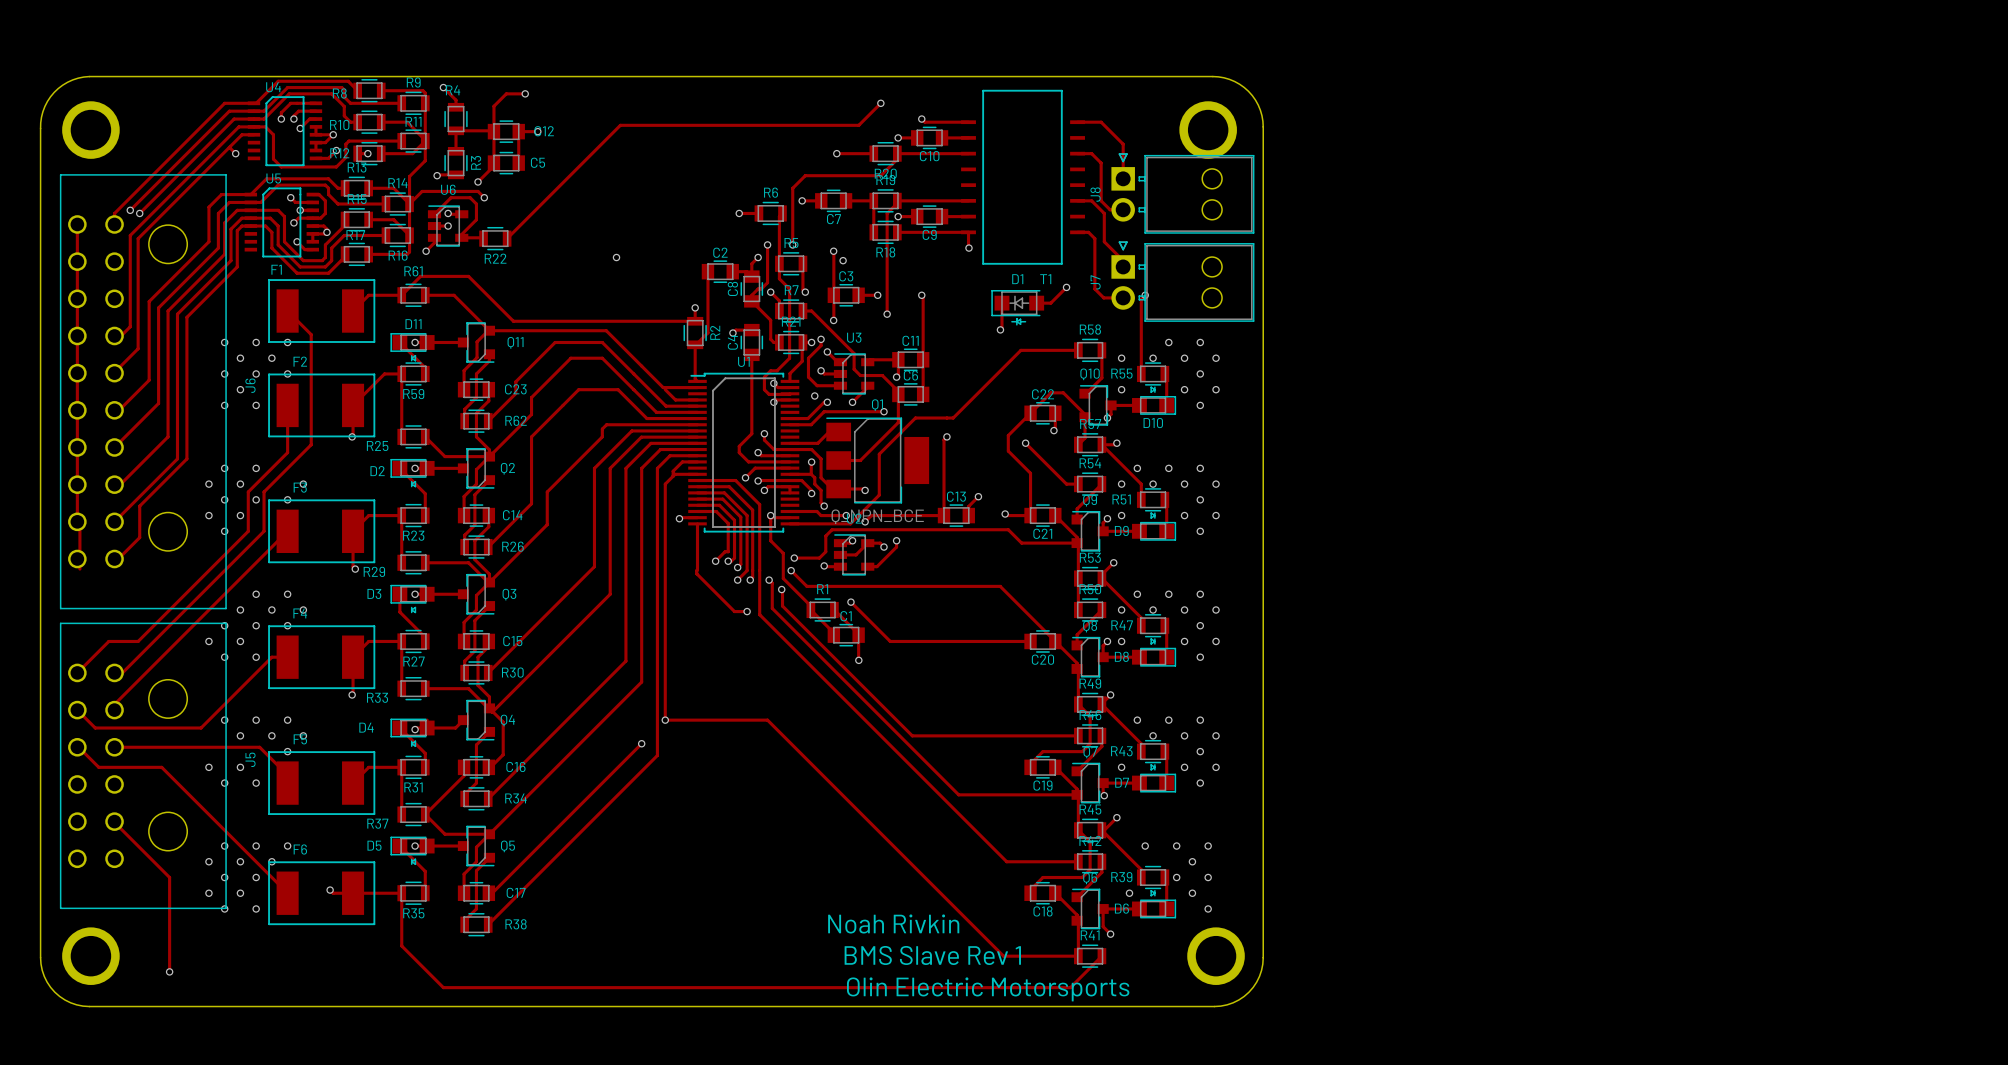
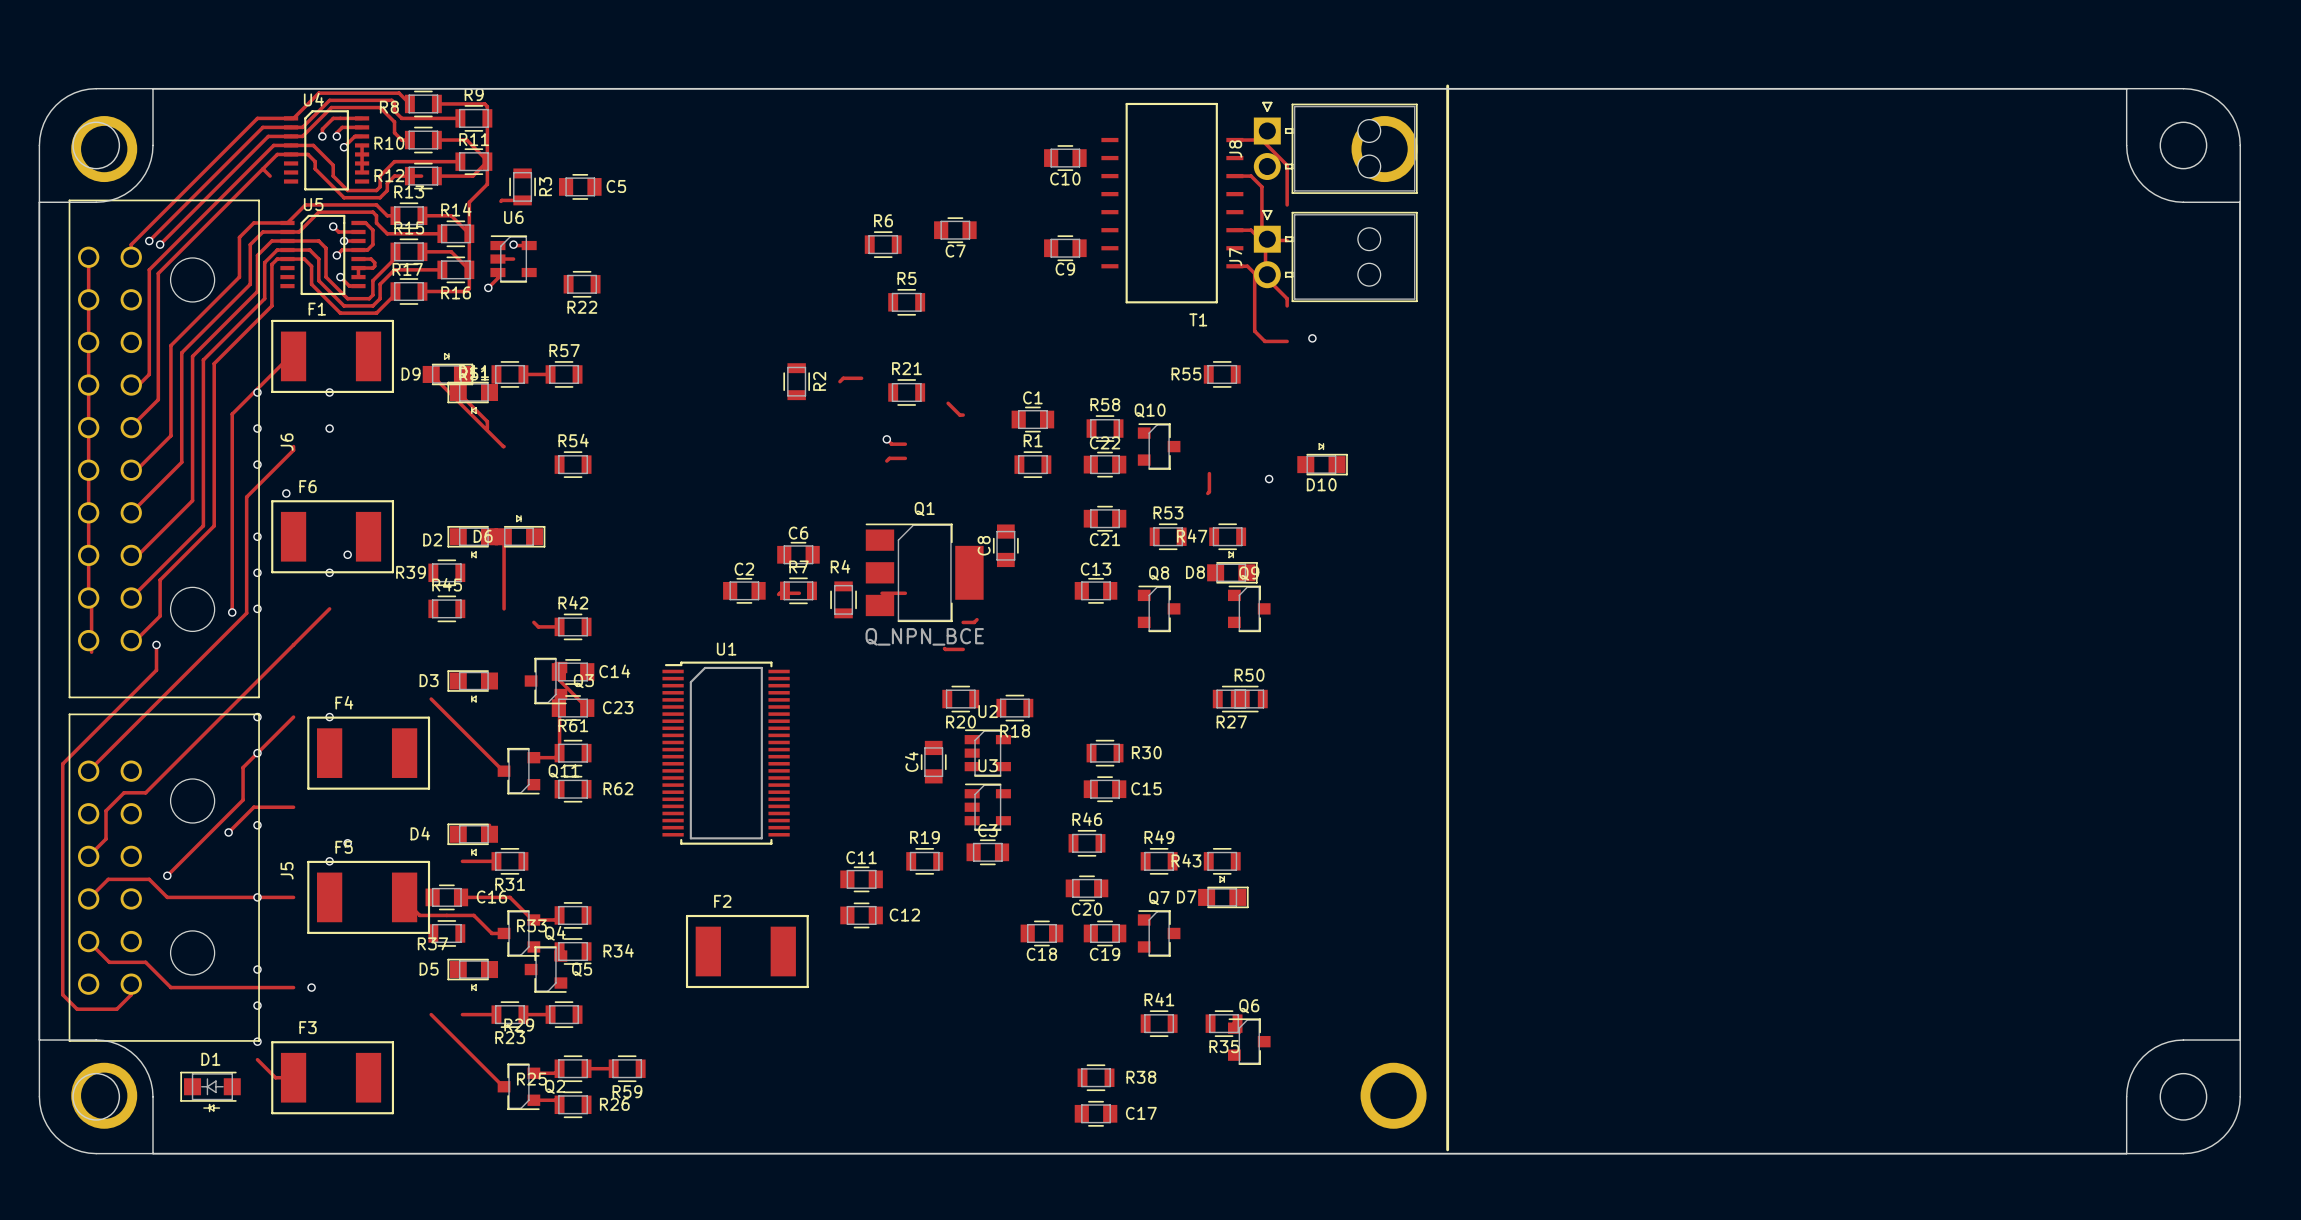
line: none -> (1447, 85) (1447, 1149)
board edge: (89, 76) (1212, 76) (1229, 79) (1244, 87) (1258, 105) (1263, 126) (1263, 957) (1261, 970) (1253, 987) (1238, 999) (1227, 1004) (1214, 1006) (89, 1006) (76, 1004) (59, 996) (47, 982) (42, 970) (40, 957) (40, 122) (44, 106) (58, 88) (72, 79) (89, 76) -> (96, 88) (74, 93) (56, 105) (43, 123) (39, 145) (39, 1096) (41, 1111) (51, 1131) (61, 1141) (74, 1149) (96, 1153) (2183, 1153) (2198, 1151) (2211, 1145) (2228, 1131) (2235, 1118) (2240, 1096) (2240, 145) (2238, 130) (2232, 117) (2218, 100) (2205, 93) (2183, 88) (96, 88)
board edge: none -> (153, 88) (152, 152) (148, 167) (136, 185) (117, 197) (103, 201) (39, 202)
board edge: none -> (2126, 88) (2127, 152) (2134, 173) (2143, 185) (2161, 197) (2176, 201) (2240, 202)
track: (443, 87) (456, 100) (456, 107) -> none
via: (443, 87) -> none
track: (525, 93) (506, 93) (493, 106) (493, 166) (478, 181) -> none
via: (525, 93) -> none
track: (880, 103) (858, 125) (620, 125) (507, 238) -> none
via: (880, 103) -> none
round board edge: none -> [72, 121, 121, 170]
round board edge: none -> [2159, 121, 2208, 170]
R4 position: (456, 119) -> (843, 599)
track: (921, 119) (924, 122) (968, 122) -> none
via: (921, 119) -> none
track: (265, 126) (273, 134) (273, 159) (281, 166) (336, 166) (345, 157) (345, 144) (348, 141) -> (304, 145) (313, 145) (333, 165) (333, 176) (347, 190) (376, 190) (380, 186) (380, 176) (394, 161) (399, 161)
track: (493, 131) (456, 130) (456, 151) -> none
C12 position: (506, 131) -> (861, 915)
track: (537, 131) (518, 131) (518, 163) -> none
via: (537, 131) -> none
track: none -> (291, 154) (307, 154) (315, 161) (315, 168) (344, 197) (380, 197) (387, 190) (387, 183) (394, 176) (409, 176)
track: (315, 134) (333, 134) (325, 142) (315, 142) -> (362, 154) (362, 163)
via: (333, 134) -> none
track: (898, 137) (917, 137) -> none
via: (898, 137) -> none
track: (942, 137) (968, 137) -> none
track: (336, 150) (328, 158) (315, 158) -> none
via: (336, 150) -> none
via: (235, 153) -> none
via: (367, 153) -> none
track: (836, 153) (873, 153) -> none
via: (836, 153) -> none
R20 position: (885, 153) -> (960, 699)
track: (968, 153) (897, 153) (897, 159) (880, 175) (805, 175) (792, 188) (792, 244) -> none
via: (437, 175) -> none
via: (478, 181) -> none
J8 position: (1182, 193) -> (1335, 147)
track: (484, 197) (478, 191) (422, 191) (409, 204) -> none
via: (484, 197) -> none
track: (802, 200) (821, 200) -> none
via: (802, 200) -> none
track: (846, 200) (873, 200) (873, 232) -> none
R19 position: (885, 200) -> (924, 861)
track: (968, 200) (897, 200) (897, 203) (887, 213) (887, 314) -> none
track: (739, 213) (758, 213) -> none
via: (739, 213) -> none
track: (782, 213) (779, 216) (779, 278) (789, 288) (789, 358) (777, 370) (770, 370) (764, 377) (764, 389) (769, 394) (789, 393) -> none
track: (434, 214) (451, 197) (470, 197) (476, 204) (476, 219) (461, 234) (461, 237) (483, 238) -> none
track: (898, 216) (917, 216) -> none
via: (898, 216) -> none
track: (942, 216) (968, 216) -> none
via: (448, 226) -> none
via: (326, 232) -> none
R18 position: (885, 232) -> (1014, 708)
track: (897, 232) (968, 232) (968, 248) -> none
R22 position: (495, 238) -> (582, 284)
track: (767, 244) (767, 282) (751, 295) (751, 301) (770, 320) (770, 339) (773, 342) (779, 342) -> none
via: (767, 244) -> none
via: (792, 244) -> none
via: (968, 248) -> none
track: (833, 251) (833, 320) -> none
via: (833, 251) -> none
via: (616, 257) -> none
track: (758, 257) (751, 263) (751, 276) (746, 271) (732, 271) -> none
via: (758, 257) -> none
via: (843, 260) -> none
track: (802, 263) (802, 289) (805, 292) -> none
track: (707, 271) (707, 332) (695, 344) (695, 379) (697, 381) -> none
C2 position: (720, 271) -> (744, 590)
J7 position: (1182, 281) -> (1335, 256)
track: (1066, 287) (1050, 303) (1036, 303) -> none
via: (1066, 287) -> none
C8 position: (751, 288) -> (1005, 545)
track: (770, 292) (779, 300) (779, 311) -> none
via: (770, 292) -> none
via: (805, 292) -> none
R61 position: (413, 295) -> (573, 753)
track: (425, 295) (454, 295) (489, 330) -> none
C3 position: (846, 295) -> (987, 852)
track: (858, 295) (877, 295) -> none
via: (877, 295) -> none
track: (921, 295) (923, 394) -> none
via: (921, 295) -> none
track: (1145, 295) (1141, 299) (1141, 373) -> none
track: (1001, 303) (1000, 329) -> none
track: (695, 307) (695, 321) (513, 321) (468, 276) (420, 276) (401, 295) (368, 295) (353, 311) -> none
via: (695, 307) -> none
D1 position: (1017, 307) -> (210, 1092)
track: none -> (293, 356) (289, 356) (232, 414) (232, 612)
track: (287, 311) (311, 334) (311, 444) (264, 491) (264, 531) (122, 672) (114, 672) -> none
F1 position: (321, 311) -> (332, 356)
R7 position: (791, 311) -> (798, 590)
track: (802, 311) (811, 311) (854, 353) (854, 369) (860, 375) (882, 375) (898, 391) (898, 422) (860, 460) (838, 460) -> none
via: (887, 314) -> none
via: (833, 320) -> none
track: none -> (431, 374) (504, 446)
track: none -> (523, 374) (550, 374)
via: (1000, 329) -> none
via: (732, 333) -> none
track: (821, 339) (821, 345) (808, 358) (808, 377) (817, 385) (840, 385) -> none
via: (821, 339) -> none
via: (256, 342) -> none
track: (415, 342) (463, 342) -> none
via: (415, 342) -> none
Q11 position: (476, 342) -> (518, 771)
C4 position: (751, 342) -> (933, 762)
track: (811, 342) (802, 342) (802, 361) (789, 373) (789, 381) -> none
via: (811, 342) -> none
via: (1168, 342) -> none
via: (1200, 342) -> none
track: (1078, 350) (1020, 350) (953, 418) (915, 418) (879, 454) (879, 495) (850, 523) (789, 523) -> none
R58 position: (1090, 350) -> (1105, 428)
track: (1101, 350) (1101, 377) (1085, 393) -> none
via: (827, 351) -> none
track: (489, 354) (489, 360) (476, 373) (476, 397) (464, 409) (464, 421) -> none
track: (751, 354) (751, 433) (739, 446) (739, 452) (748, 461) (789, 461) -> none
via: (240, 358) -> none
via: (271, 358) -> none
via: (1121, 358) -> none
via: (1153, 358) -> none
via: (1184, 358) -> none
via: (1216, 358) -> none
C11 position: (910, 359) -> (861, 879)
track: (867, 362) (870, 359) (898, 359) (898, 375) (896, 377) -> none
track: (821, 370) (824, 373) (840, 373) -> none
via: (821, 370) -> none
via: (256, 373) -> none
R59 position: (413, 373) -> (627, 1068)
U3 position: (854, 373) -> (987, 807)
R55 position: (1153, 373) -> (1222, 374)
track: (1164, 373) (1166, 375) (1166, 405) -> none
via: (1200, 373) -> none
via: (896, 377) -> none
track: (867, 385) (852, 402) -> none
track: (697, 387) (663, 387) (606, 330) (488, 330) (477, 341) (477, 357) (464, 370) (464, 389) -> none
via: (240, 389) -> none
C23 position: (476, 389) -> (573, 708)
track: (488, 389) (488, 400) (476, 413) (476, 436) (489, 449) (489, 456) (444, 456) (425, 436) -> none
track: (665, 389) (675, 399) (697, 399) -> none
via: (1121, 389) -> none
via: (1184, 389) -> none
via: (1216, 389) -> none
C6 position: (910, 394) -> (798, 554)
via: (814, 395) -> none
via: (773, 402) -> none
track: (827, 402) (824, 402) (807, 418) (789, 418) -> none
via: (827, 402) -> none
via: (852, 402) -> none
via: (256, 405) -> none
track: (287, 405) (287, 452) (248, 491) (248, 531) (138, 641) (108, 641) -> (293, 446) (293, 450) (246, 497) (246, 613) (124, 735)
F2 position: (321, 405) -> (747, 951)
Q10 position: (1098, 405) -> (1159, 446)
track: (1139, 405) (1111, 405) (1111, 414) (1107, 418) -> none
via: (1200, 405) -> none
track: (697, 406) (666, 406) (602, 342) (555, 342) (515, 381) (515, 393) (488, 421) -> none
track: (884, 411) (824, 411) (811, 424) (789, 424) -> none
via: (884, 411) -> none
track: (697, 412) (656, 412) (602, 358) (570, 358) (531, 397) (531, 414) (476, 469) (476, 484) (464, 496) (464, 515) -> none
C22 position: (1042, 413) -> (1105, 464)
track: (697, 418) (646, 418) (618, 389) (578, 389) (531, 436) (531, 503) (488, 547) -> (533, 622) (538, 626) (559, 626)
R62 position: (476, 421) -> (573, 789)
track: (697, 424) (606, 424) (602, 429) (602, 436) (547, 491) (547, 524) (476, 595) (476, 609) (464, 622) (464, 641) -> none
via: none -> (286, 493)
track: (697, 430) (631, 430) (594, 468) (594, 566) (488, 672) -> none
via: (1053, 430) -> none
track: (838, 432) (829, 432) (817, 443) (789, 443) -> none
track: (764, 433) (764, 440) (773, 449) (811, 449) (821, 458) (821, 477) (832, 489) (865, 490) -> none
via: (764, 433) -> none
track: (352, 436) (353, 405) (384, 373) (401, 373) (401, 436) -> none
via: (352, 436) -> none
R25 position: (413, 436) -> (573, 1068)
track: (946, 436) (944, 439) (944, 515) (871, 515) (865, 521) -> none
via: (946, 436) -> none
track: (697, 437) (641, 437) (610, 468) (610, 594) (492, 712) (489, 708) -> none
track: (697, 443) (650, 443) (625, 468) (625, 661) (488, 798) -> (461, 897) (509, 897) (532, 919) (555, 919) (559, 915)
track: (1025, 443) (1066, 484) (1078, 484) -> none
via: (1025, 443) -> none
track: (1116, 443) (1101, 444) (1141, 484) (1141, 499) -> none
via: (1116, 443) -> none
track: (1078, 444) (1085, 438) (1085, 414) (1063, 392) (1051, 392) (1008, 435) (1008, 451) (1030, 473) (1030, 515) (1005, 514) -> none
R57 position: (1090, 444) -> (564, 374)
track: (697, 449) (660, 449) (641, 468) (641, 682) (476, 847) (476, 861) (464, 874) (464, 893) -> none
U1 position: (743, 452) -> (726, 753)
track: (758, 452) (761, 455) (789, 455) -> none
via: (758, 452) -> none
track: (697, 455) (670, 455) (657, 468) (657, 755) (488, 924) -> none
Q1 position: (877, 460) -> (924, 572)
track: (697, 461) (682, 461) (673, 471) (673, 476) -> none
track: (811, 462) (811, 474) -> none
via: (811, 462) -> none
via: (256, 468) -> none
track: (399, 468) (425, 493) (425, 515) -> none
track: (415, 468) (463, 468) -> none
via: (415, 468) -> none
track: none -> (503, 536) (504, 608)
Q2 position: (476, 468) -> (518, 1086)
track: (789, 468) (755, 468) (745, 477) -> none
via: (1137, 468) -> none
via: (1168, 468) -> none
via: (1200, 468) -> none
track: (697, 474) (675, 474) (665, 484) (665, 720) (767, 720) (1003, 956) (1078, 956) (1077, 915) (1055, 893) -> none
track: (789, 474) (811, 474) -> none
track: (811, 474) (814, 477) (814, 484) (821, 490) (821, 502) (824, 506) -> none
via: (745, 477) -> none
track: (489, 480) (474, 494) (474, 525) (464, 535) (464, 547) -> none
track: (697, 480) (735, 480) (759, 504) (759, 614) (1006, 861) (1078, 861) -> none
track: (758, 480) (801, 480) (811, 490) (811, 493) -> none
via: (758, 480) -> none
via: (208, 484) -> none
via: (240, 484) -> none
R54 position: (1090, 484) -> (573, 464)
track: (1101, 484) (1077, 508) (1077, 519) -> none
via: (1121, 484) -> none
via: (1153, 484) -> none
via: (1184, 484) -> none
via: (1216, 484) -> none
track: (697, 486) (729, 486) (752, 510) (752, 577) (750, 580) -> none
track: (764, 490) (768, 486) (789, 486) (789, 492) -> none
via: (764, 490) -> none
via: (865, 490) -> none
track: (697, 492) (724, 492) (747, 515) (747, 570) (737, 580) -> none
via: (811, 493) -> none
track: (978, 496) (968, 506) (968, 515) -> none
via: (978, 496) -> none
via: (256, 499) -> none
track: (697, 499) (722, 499) (740, 517) (740, 564) (737, 567) -> none
R51 position: (1153, 499) -> (509, 374)
track: (1164, 499) (1166, 501) (1166, 531) -> none
via: (1200, 499) -> none
track: (697, 505) (719, 505) (734, 520) (734, 558) (728, 561) -> none
via: (824, 506) -> none
track: (697, 511) (716, 511) (728, 523) (728, 551) (725, 551) (715, 561) -> none
track: (789, 511) (816, 511) (821, 515) (846, 515) -> none
via: (1005, 514) -> none
via position: (208, 515) -> (232, 612)
via: (240, 515) -> none
R23 position: (413, 515) -> (509, 1014)
C14 position: (476, 515) -> (573, 671)
track: (488, 515) (488, 526) (474, 540) (474, 559) (489, 574) (489, 582) (468, 562) (425, 562) -> none
track: (770, 515) (770, 540) (783, 553) (783, 578) (810, 606) (810, 609) (833, 635) -> none
via: (770, 515) -> none
via: (846, 515) -> none
C21 position: (1042, 515) -> (1105, 518)
track: (1055, 515) (1077, 537) (1077, 543) -> none
via: (1121, 515) -> none
via: (1184, 515) -> none
via: (1216, 515) -> none
via: (679, 518) -> none
track: (1107, 518) (1103, 523) (1103, 531) (1139, 531) -> none
via: (1107, 518) -> none
via: (865, 521) -> none
track: (697, 523) (696, 573) (734, 611) (747, 611) -> none
D9 position: (1154, 526) -> (447, 369)
F3 position: (321, 531) -> (332, 1077)
via: (1200, 531) -> none
via: (852, 540) -> none
track: (896, 540) (896, 547) (876, 566) (867, 566) -> none
via: (896, 540) -> none
track: (1077, 543) (1021, 543) (1008, 529) (832, 529) (825, 536) (825, 551) (819, 558) (794, 558) -> none
track: (1077, 543) (1078, 609) -> none
R26 position: (476, 547) -> (573, 1104)
track: (884, 547) (880, 543) (867, 543) (855, 554) (840, 554) -> none
via: (884, 547) -> none
U2 position: (854, 554) -> (987, 753)
via: (794, 558) -> none
via: (715, 561) -> none
via: (728, 561) -> none
track: none -> (156, 644) (156, 670) (62, 763) (62, 994) (77, 1009) (116, 1009) (131, 994) (131, 984)
via: none -> (156, 644)
track: (401, 562) (401, 515) (368, 515) (353, 531) (353, 566) (355, 569) -> none
R29 position: (413, 562) -> (564, 1014)
track: (1113, 562) (1101, 574) (1101, 578) (1141, 617) (1141, 625) -> none
via: (1113, 562) -> none
via: (824, 565) -> none
via: (737, 567) -> none
via: (355, 569) -> none
track: (791, 570) (806, 586) (1000, 586) (1077, 663) (1078, 704) (1090, 716) (1090, 743) (1082, 751) (1042, 751) (1030, 764) (1030, 767) -> none
via: (791, 570) -> none
R53 position: (1090, 578) -> (1168, 536)
via: (737, 580) -> none
via: (750, 580) -> none
track: (769, 580) (772, 583) (772, 608) (958, 794) (1077, 794) -> none
via: (769, 580) -> none
track: none -> (558, 671) (558, 679) (587, 708)
track: (781, 589) (782, 606) (912, 735) (1078, 735) -> none
via: (781, 589) -> none
via: (256, 594) -> none
via: (287, 594) -> none
track: (399, 594) (399, 612) (425, 637) (425, 641) -> none
track: (415, 594) (463, 594) -> none
via: (415, 594) -> none
via: (1137, 594) -> none
via: (1168, 594) -> none
via: (1200, 594) -> none
track: (850, 602) (890, 641) (1030, 641) -> none
via: (850, 602) -> none
track: (489, 606) (474, 620) (474, 650) (464, 661) (464, 672) -> none
via: (240, 609) -> none
via: (271, 609) -> none
via: (303, 609) -> none
track: none -> (431, 699) (504, 771)
R1 position: (822, 609) -> (1032, 464)
track: (834, 609) (858, 634) (858, 660) -> none
track: (1101, 609) (1077, 634) (1077, 645) -> none
via: (1121, 609) -> none
via: (1153, 609) -> none
via: (1184, 609) -> none
via: (1216, 609) -> none
via: (747, 611) -> none
track: none -> (558, 708) (559, 753) (555, 757) (533, 757)
track: none -> (293, 717) (243, 767) (243, 800) (167, 875)
via: (256, 625) -> none
R47 position: (1153, 625) -> (1227, 536)
track: (1164, 625) (1166, 627) (1166, 657) -> none
via: (1200, 625) -> none
C1 position: (846, 635) -> (1032, 419)
via: (208, 641) -> none
via: (240, 641) -> none
R27 position: (413, 641) -> (1231, 699)
C15 position: (476, 641) -> (1105, 789)
track: (488, 641) (488, 646) (478, 657) (478, 685) (489, 696) (489, 708) -> none
C20 position: (1042, 641) -> (1086, 888)
track: (1107, 641) (1103, 645) (1103, 657) (1139, 657) -> none
via: (1107, 641) -> none
via: (1121, 641) -> none
via: (1184, 641) -> none
via: (1216, 641) -> none
D8 position: (1154, 652) -> (1232, 567)
via: (256, 657) -> none
track: (287, 657) (271, 657) (201, 728) (95, 728) (77, 710) -> none
Q8 position: (1090, 657) -> (1159, 608)
via: (1200, 657) -> none
via: (858, 660) -> none
R30 position: (476, 672) -> (1105, 753)
track: (401, 688) (401, 641) (368, 641) (353, 657) (352, 694) -> none
R33 position: (413, 688) -> (573, 915)
track: (425, 688) (468, 688) (489, 708) -> none
track: (127, 691) (114, 704) (114, 710) -> (145, 792) (124, 792) (106, 810) (106, 839) (88, 856)
via: (352, 694) -> none
track: (1110, 694) (1101, 704) (1141, 743) (1141, 751) -> none
via: (1110, 694) -> none
track: none -> (293, 807) (253, 807) (228, 832)
R49 position: (1090, 704) -> (1159, 861)
track: (489, 708) (503, 722) (503, 754) (488, 767) -> none
via: (256, 720) -> none
via: (287, 720) -> none
track: (463, 720) (455, 728) (416, 728) (415, 729) -> none
Q4 position: (476, 720) -> (518, 933)
via: (665, 720) -> none
via: (1137, 720) -> none
via: (1168, 720) -> none
via: (1200, 720) -> none
via: none -> (228, 832)
track: (399, 728) (425, 753) (425, 767) -> none
via: (415, 729) -> none
track: (489, 731) (476, 744) (476, 783) (464, 794) (464, 798) -> none
via: (240, 735) -> none
via: (271, 735) -> none
R46 position: (1090, 735) -> (1086, 843)
track: (1101, 735) (1101, 746) (1077, 771) -> none
via: (1153, 735) -> none
via: (1184, 735) -> none
via: (1216, 735) -> none
track: (641, 743) (492, 893) (488, 893) -> none
via: (641, 743) -> none
track: (77, 747) (98, 767) -> (88, 898) (108, 879) (113, 879)
track: (114, 747) (259, 747) (287, 775) (287, 783) -> none
track: none -> (462, 861) (496, 861)
R43 position: (1153, 751) -> (1222, 861)
track: (1164, 751) (1166, 753) (1166, 783) -> none
via: (1200, 751) -> none
via: none -> (167, 875)
track: (130, 767) (161, 767) (287, 893) -> (149, 879) (167, 897) (293, 897)
via: (208, 767) -> none
via: (240, 767) -> none
track: none -> (410, 879) (410, 906) (419, 915) (473, 915) (491, 933) (504, 933)
R31 position: (413, 767) -> (509, 861)
track: (464, 767) (464, 775) (425, 814) (444, 834) (489, 834) -> none
C16 position: (476, 767) -> (446, 897)
C19 position: (1042, 767) -> (1105, 933)
track: (1055, 767) (1077, 789) (1077, 794) -> none
via: (1121, 767) -> none
via: (1184, 767) -> none
via: (1216, 767) -> none
D7 position: (1154, 778) -> (1223, 892)
via: (256, 783) -> none
track: (353, 783) (368, 767) (401, 767) (401, 814) -> none
Q7 position: (1090, 783) -> (1159, 933)
track: (1139, 783) (1103, 783) (1104, 795) -> none
via: (1200, 783) -> none
track: (1077, 794) (1078, 830) (1090, 842) (1090, 869) (1082, 877) (1042, 877) (1030, 889) (1030, 893) -> none
via: (1104, 795) -> none
R34 position: (476, 798) -> (573, 951)
R37 position: (413, 814) -> (446, 933)
track: (1116, 817) (1104, 830) (1101, 830) (1141, 869) (1141, 877) -> none
via: (1116, 817) -> none
track: none -> (88, 941) (109, 962) (145, 962) (170, 987) (293, 987)
track: (120, 821) (114, 822) (169, 877) (169, 971) -> none
R45 position: (1090, 830) -> (446, 608)
via: (256, 846) -> none
via: (287, 846) -> none
track: (399, 846) (425, 871) (425, 893) -> none
track: (415, 846) (463, 846) -> none
via: (415, 846) -> none
via: (1145, 846) -> none
via: (1176, 846) -> none
via: (1208, 846) -> none
track: (489, 857) (476, 870) (476, 908) (464, 920) (464, 924) -> none
via: (208, 861) -> none
via: (240, 861) -> none
R42 position: (1090, 861) -> (573, 626)
track: (1101, 861) (1101, 872) (1077, 897) -> none
via: (1192, 861) -> none
via: (256, 877) -> none
R39 position: (1153, 877) -> (446, 572)
track: (1164, 877) (1166, 879) (1166, 908) -> none
via: (1176, 877) -> none
via: (1208, 877) -> none
track: none -> (431, 1014) (504, 1086)
track: none -> (462, 1014) (496, 1014)
track: none -> (523, 1014) (550, 1014)
track: (330, 890) (333, 893) (401, 893) (401, 945) (443, 987) (1070, 987) (1101, 956) -> none
via: (330, 890) -> none
via: (208, 893) -> none
via: (240, 893) -> none
F6 position: (321, 893) -> (332, 536)
R35 position: (413, 893) -> (1224, 1023)
C17 position: (476, 893) -> (1096, 1113)
C18 position: (1042, 893) -> (1041, 933)
via: (1129, 893) -> none
via: (1192, 893) -> none
D6 position: (1154, 904) -> (520, 531)
board edge: none -> (39, 1040) (103, 1040) (124, 1047) (136, 1056) (148, 1075) (152, 1089) (153, 1153)
board edge: none -> (2240, 1040) (2176, 1040) (2155, 1047) (2143, 1056) (2134, 1068) (2127, 1089) (2126, 1153)
via: (256, 908) -> none
track: (1139, 908) (1103, 908) (1103, 926) (1110, 934) -> none
via: (1208, 908) -> none
text: Noah Rivkin (893, 923) -> none
track: none -> (257, 1059) (275, 1077) (293, 1077)
R38 position: (476, 924) -> (1096, 1077)
track: none -> (559, 1068) (555, 1073) (533, 1073)
track: none -> (586, 1068) (613, 1068)
via: (1110, 934) -> none
round board edge: none -> [72, 1072, 121, 1121]
round board edge: none -> [2159, 1072, 2208, 1121]
text: BMS Slave Rev 1 (932, 955) -> none
R41 position: (1090, 956) -> (1159, 1023)
track: none -> (533, 1100) (555, 1100) (559, 1104)
via: (169, 971) -> none
text: Olin Electric Motorsports (988, 989) -> none

